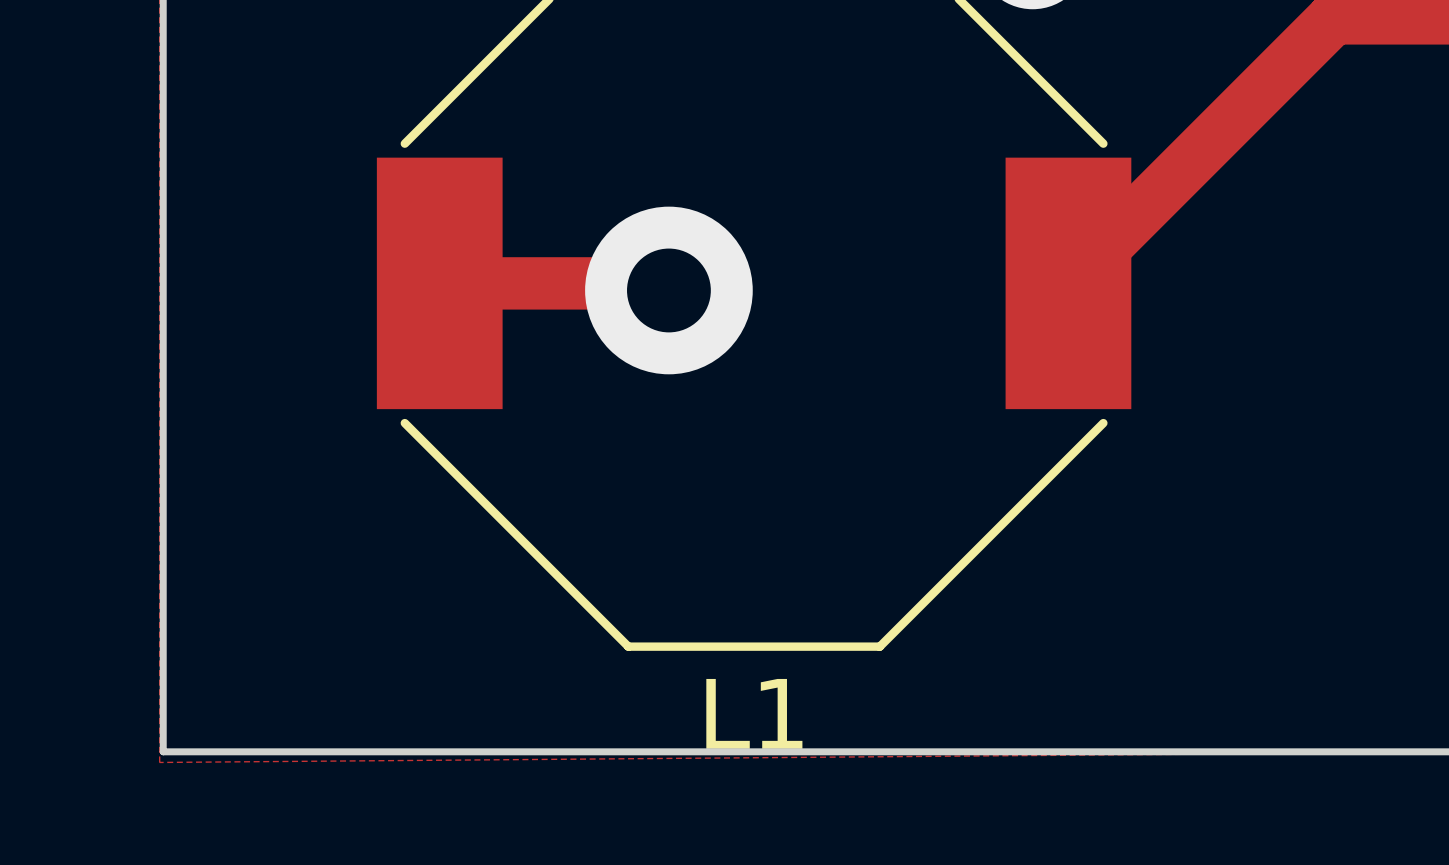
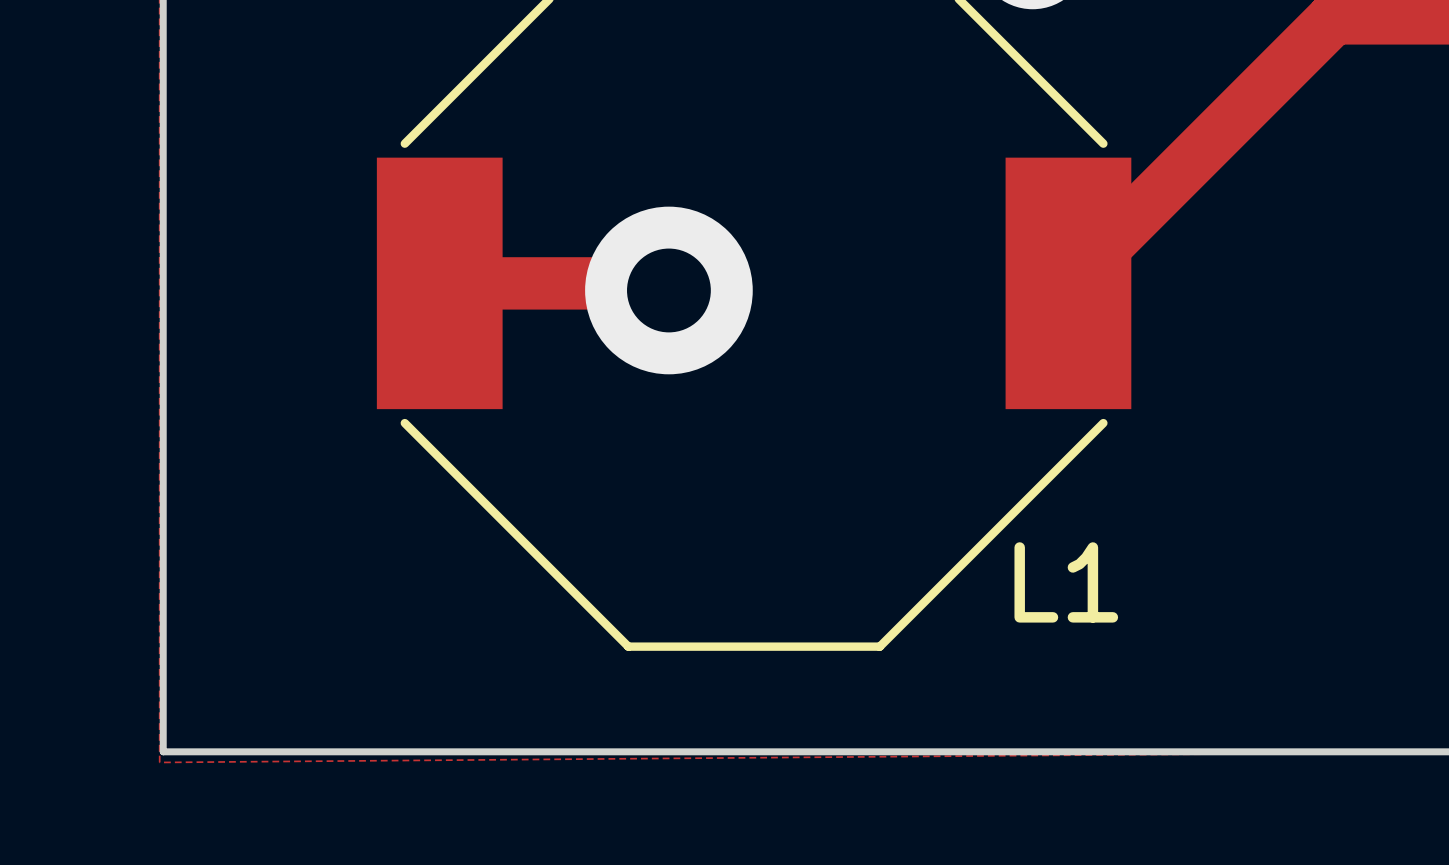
L1 name position: L1 (754, 713) -> L1 (1066, 582)

